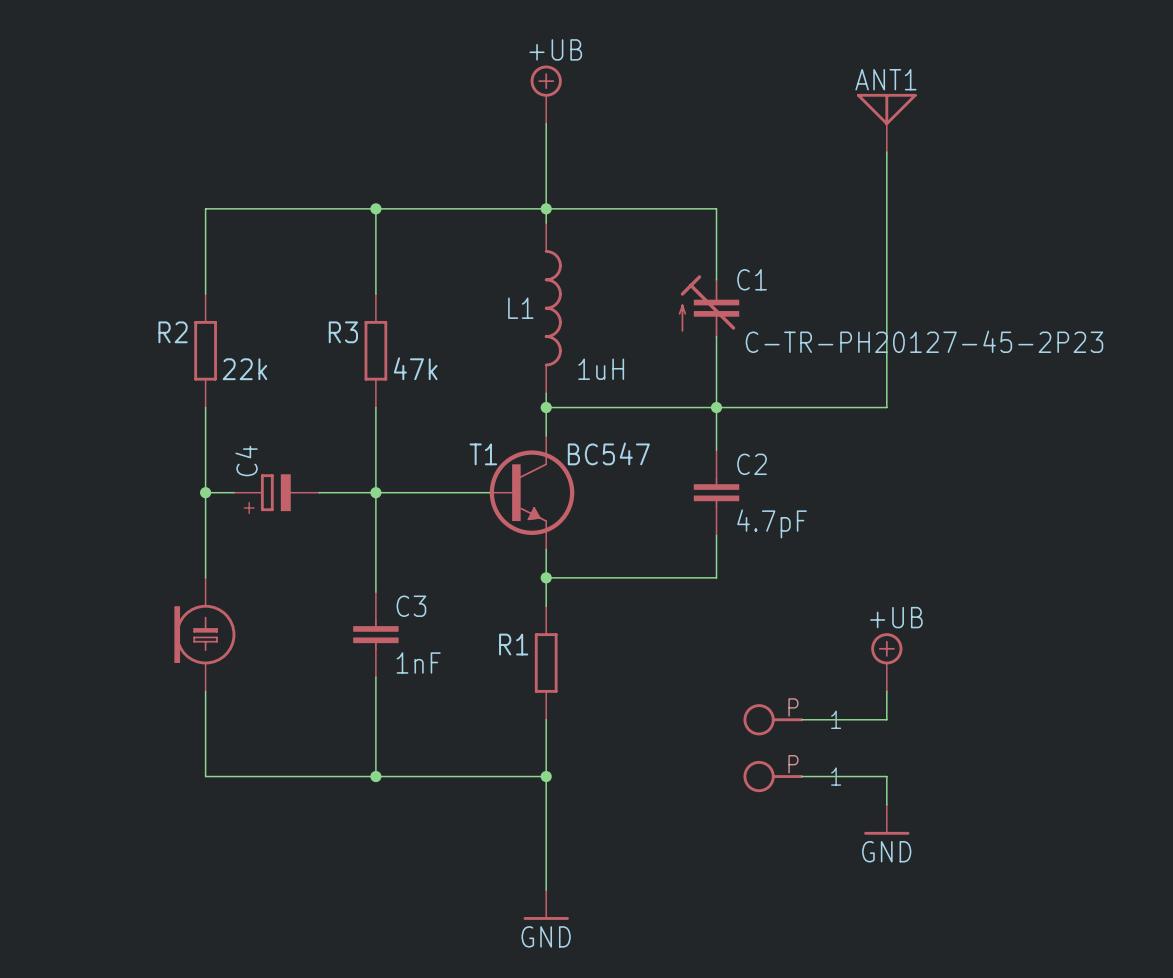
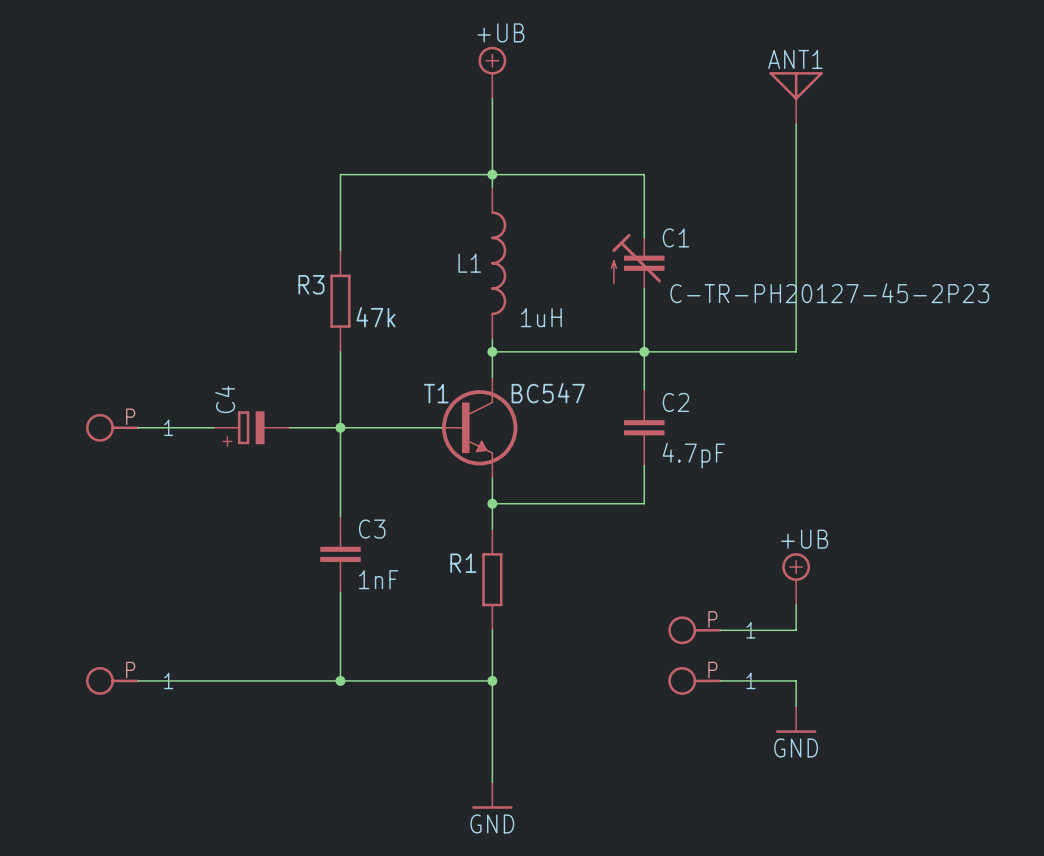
wire: (375, 208) (205, 208) (205, 294) -> none
junction: (375, 208) -> none
R2: 22k (205, 350) -> none
wire: (205, 407) (205, 577) -> none
part: none -> (112, 427)
wire: none -> (137, 427) (188, 427)
junction: (205, 492) -> none
part: (204, 634) -> none
wire: (205, 691) (205, 776) -> (137, 680) (188, 680)
part: none -> (112, 680)

